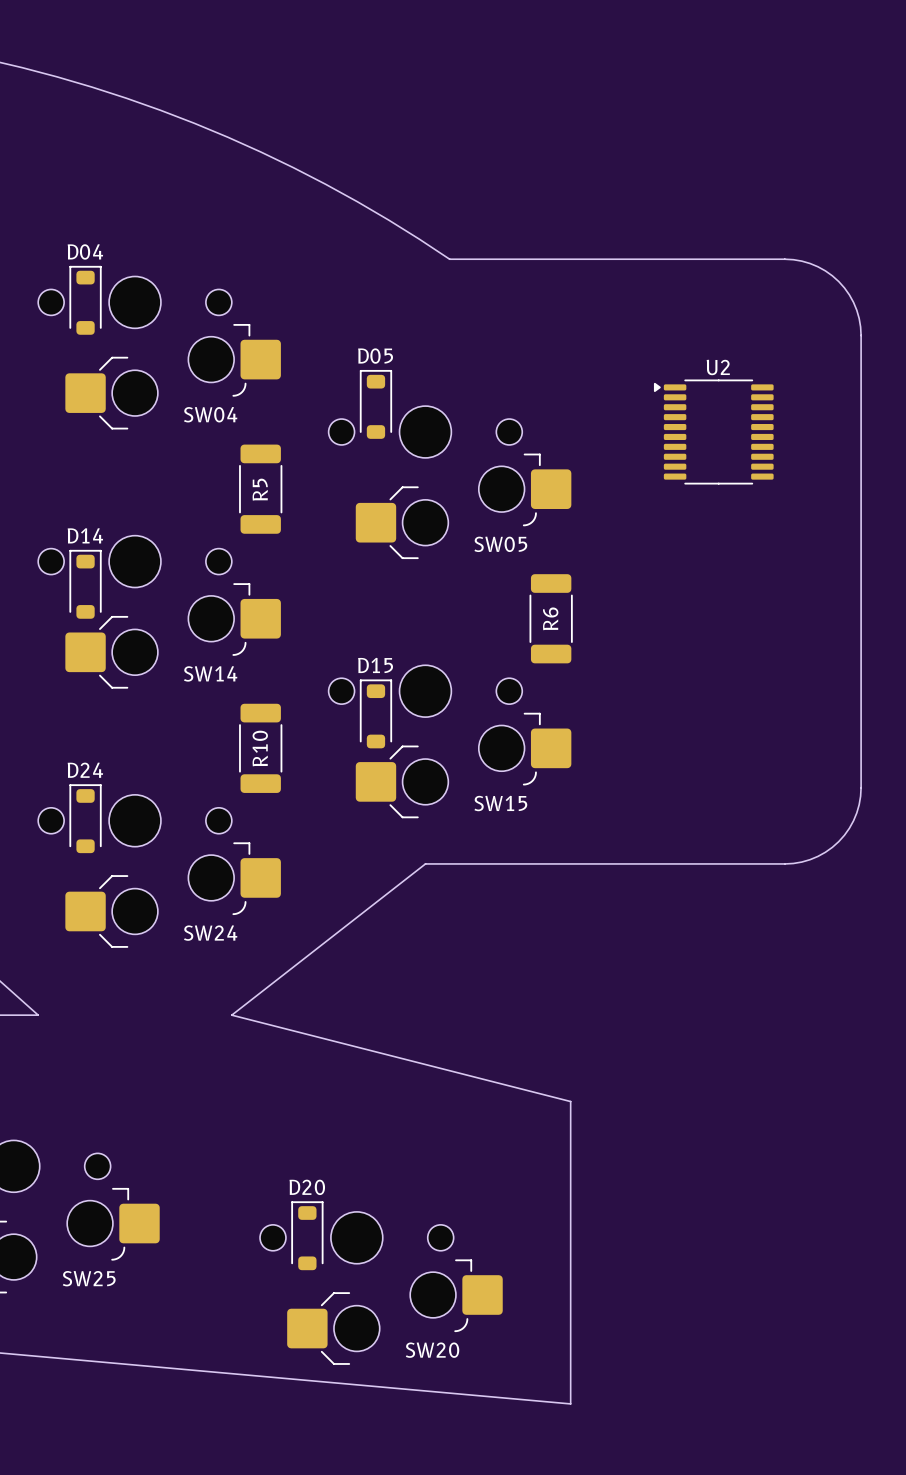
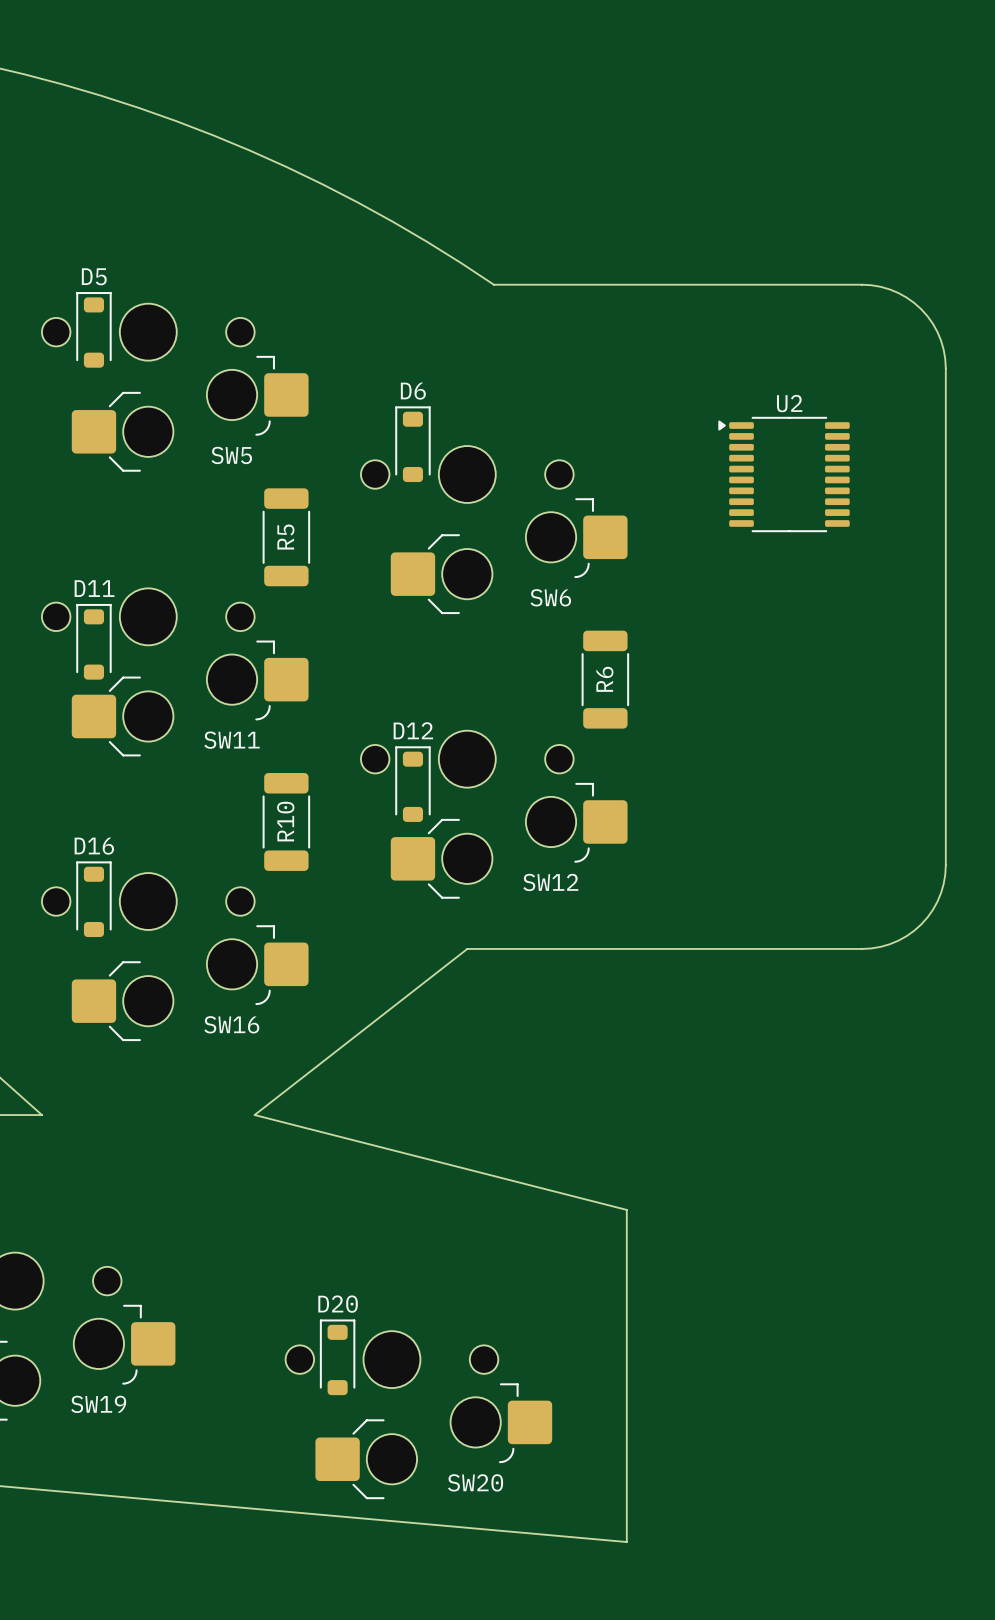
D04 name: D04 (85, 251) -> D5 (94, 276)
D05 name: D05 (375, 356) -> D6 (413, 391)
SW04 name: SW04 (210, 414) -> SW5 (231, 455)
D14 name: D14 (85, 535) -> D11 (94, 588)
SW05 name: SW05 (500, 544) -> SW6 (550, 597)
D15 name: D15 (375, 665) -> D12 (413, 730)
SW14 name: SW14 (210, 673) -> SW11 (232, 740)
D24 name: D24 (85, 770) -> D16 (94, 846)
SW15 name: SW15 (500, 803) -> SW12 (550, 882)
SW24 name: SW24 (210, 933) -> SW16 (231, 1024)
SW25 name: SW25 (89, 1278) -> SW19 (98, 1404)

